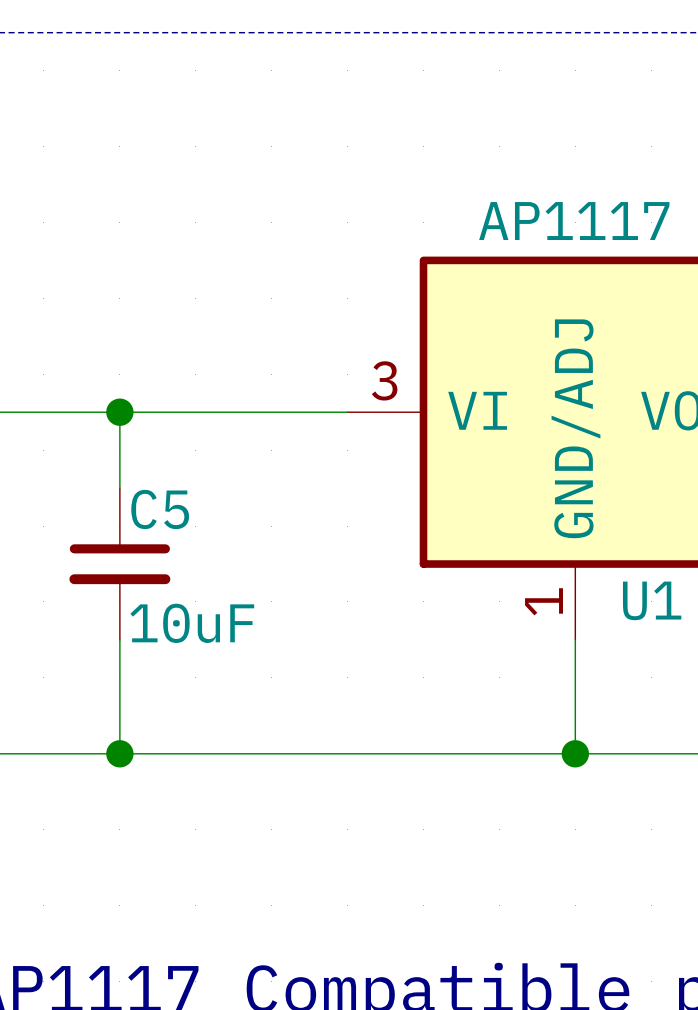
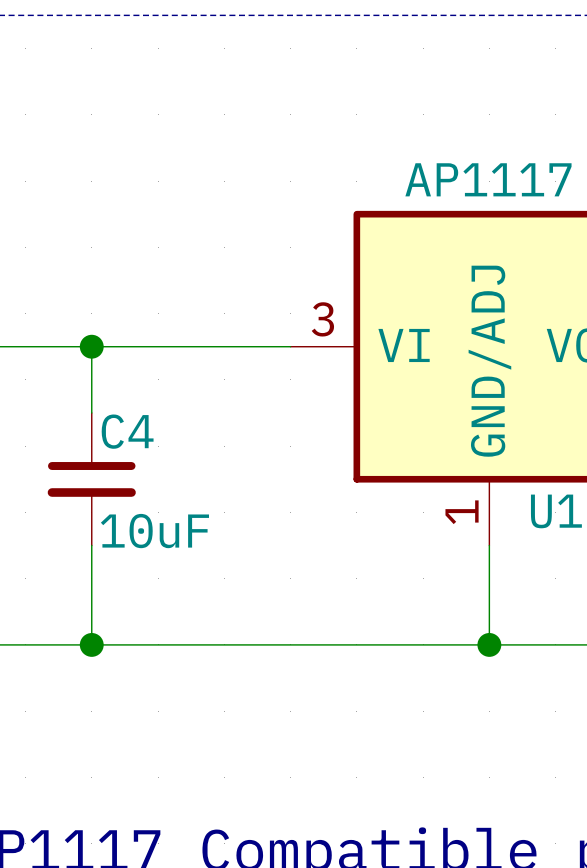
C5 name: C5 (160, 509) -> C4 (127, 431)

